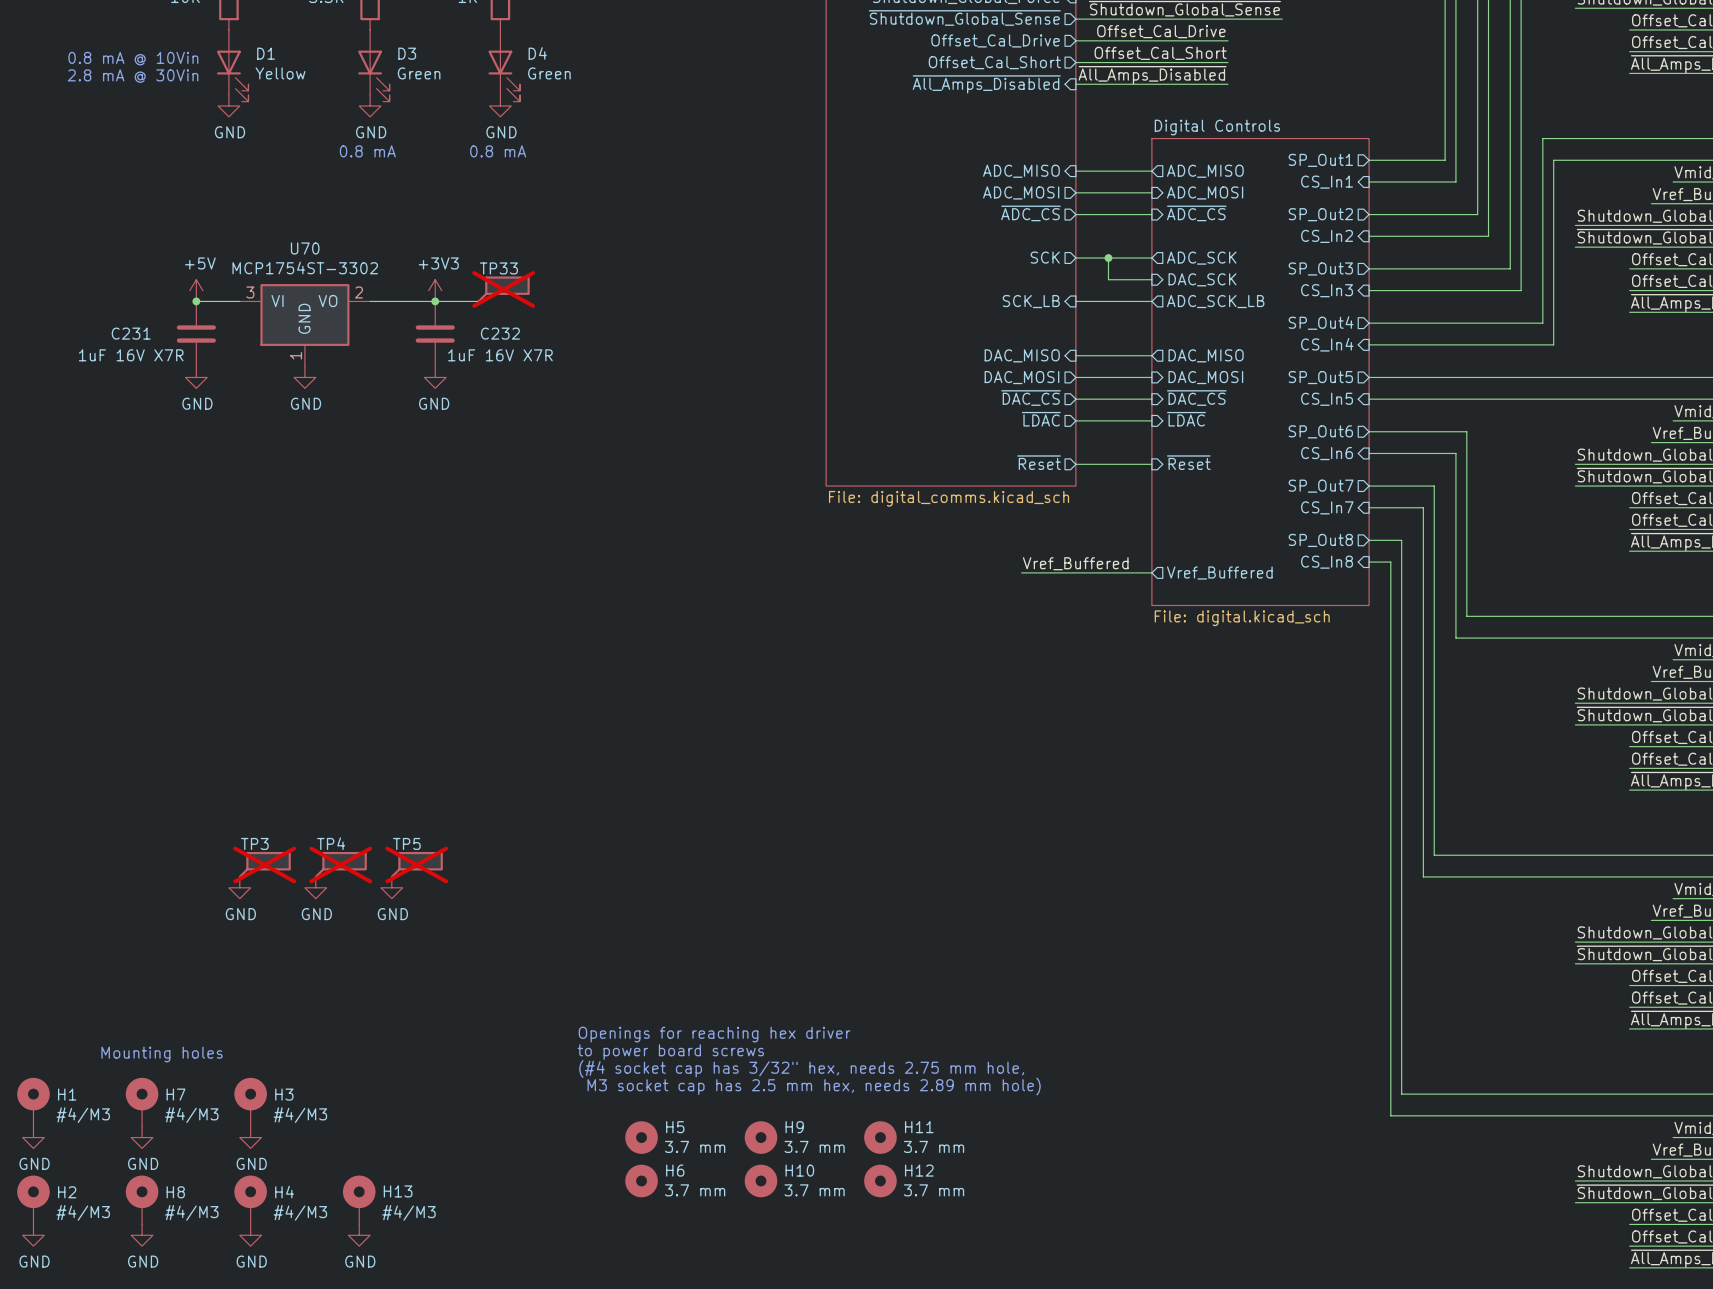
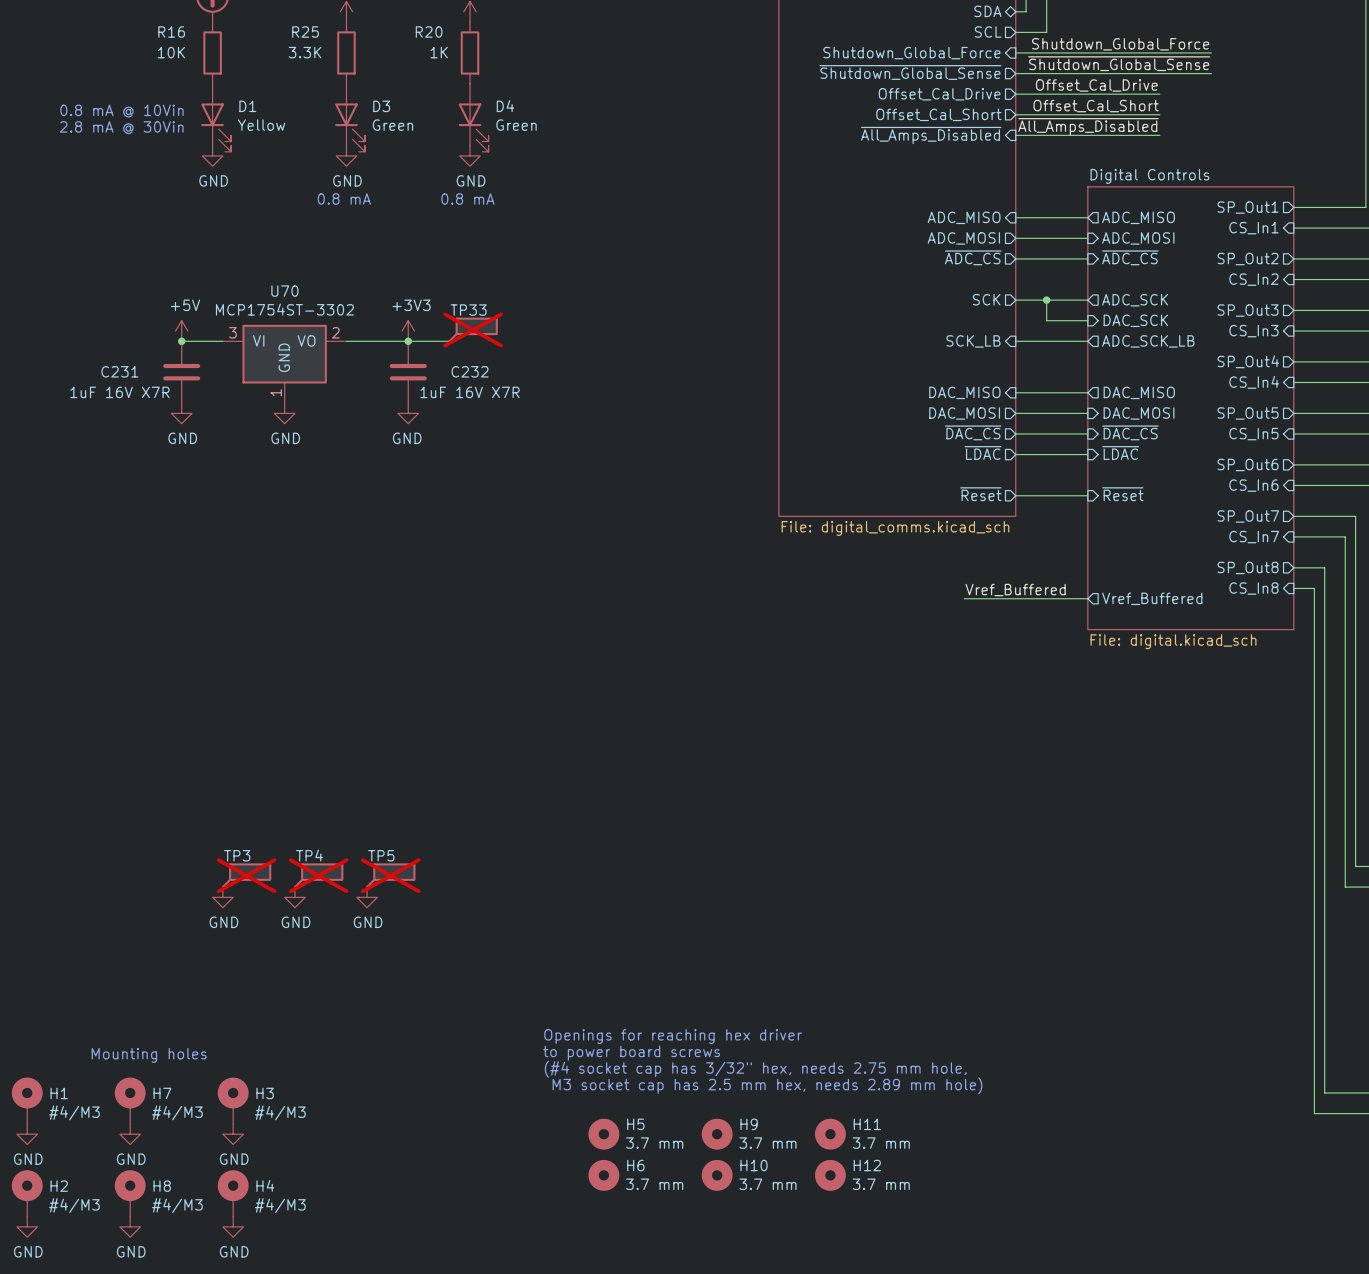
H13: #4/M3 (359, 1199) -> none
power symbol: GND (359, 1235) -> none

